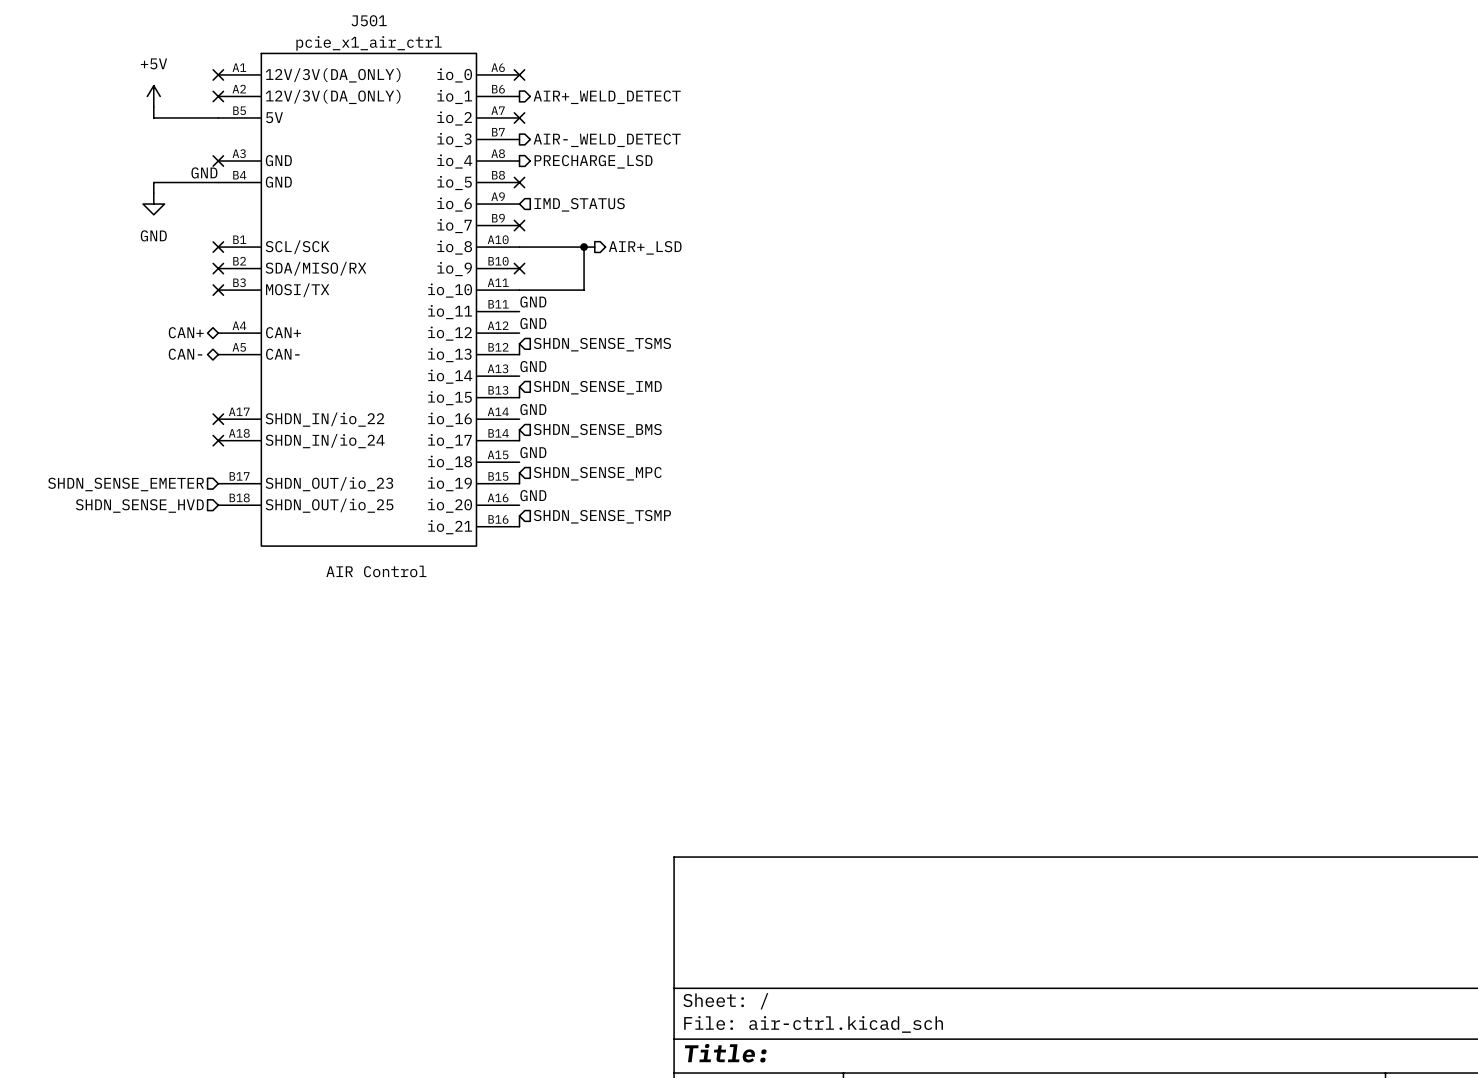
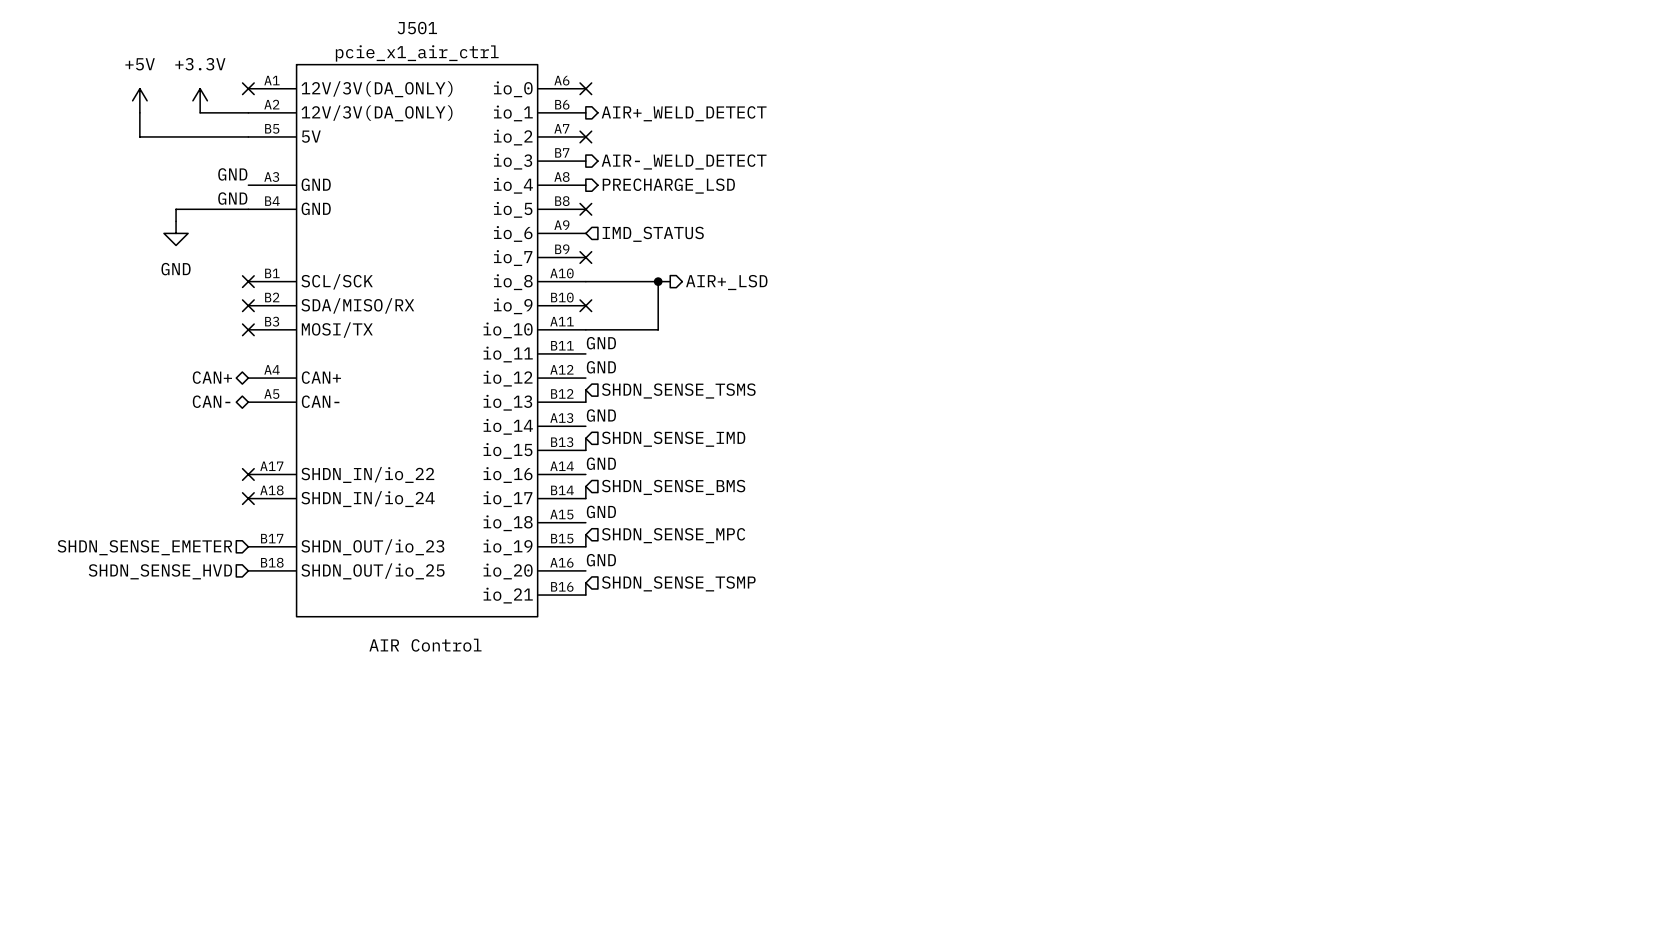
power symbol: none -> +3.3V (200, 100)
power symbol position: +5V (153, 96) -> +5V (139, 100)
wire: none -> (200, 112) (248, 112)
no-connect mark: (218, 96) -> none
wire: (153, 107) (153, 117) -> (139, 112) (139, 136) (176, 136)
label: none -> GND (232, 174)
no-connect mark: (218, 161) -> none

